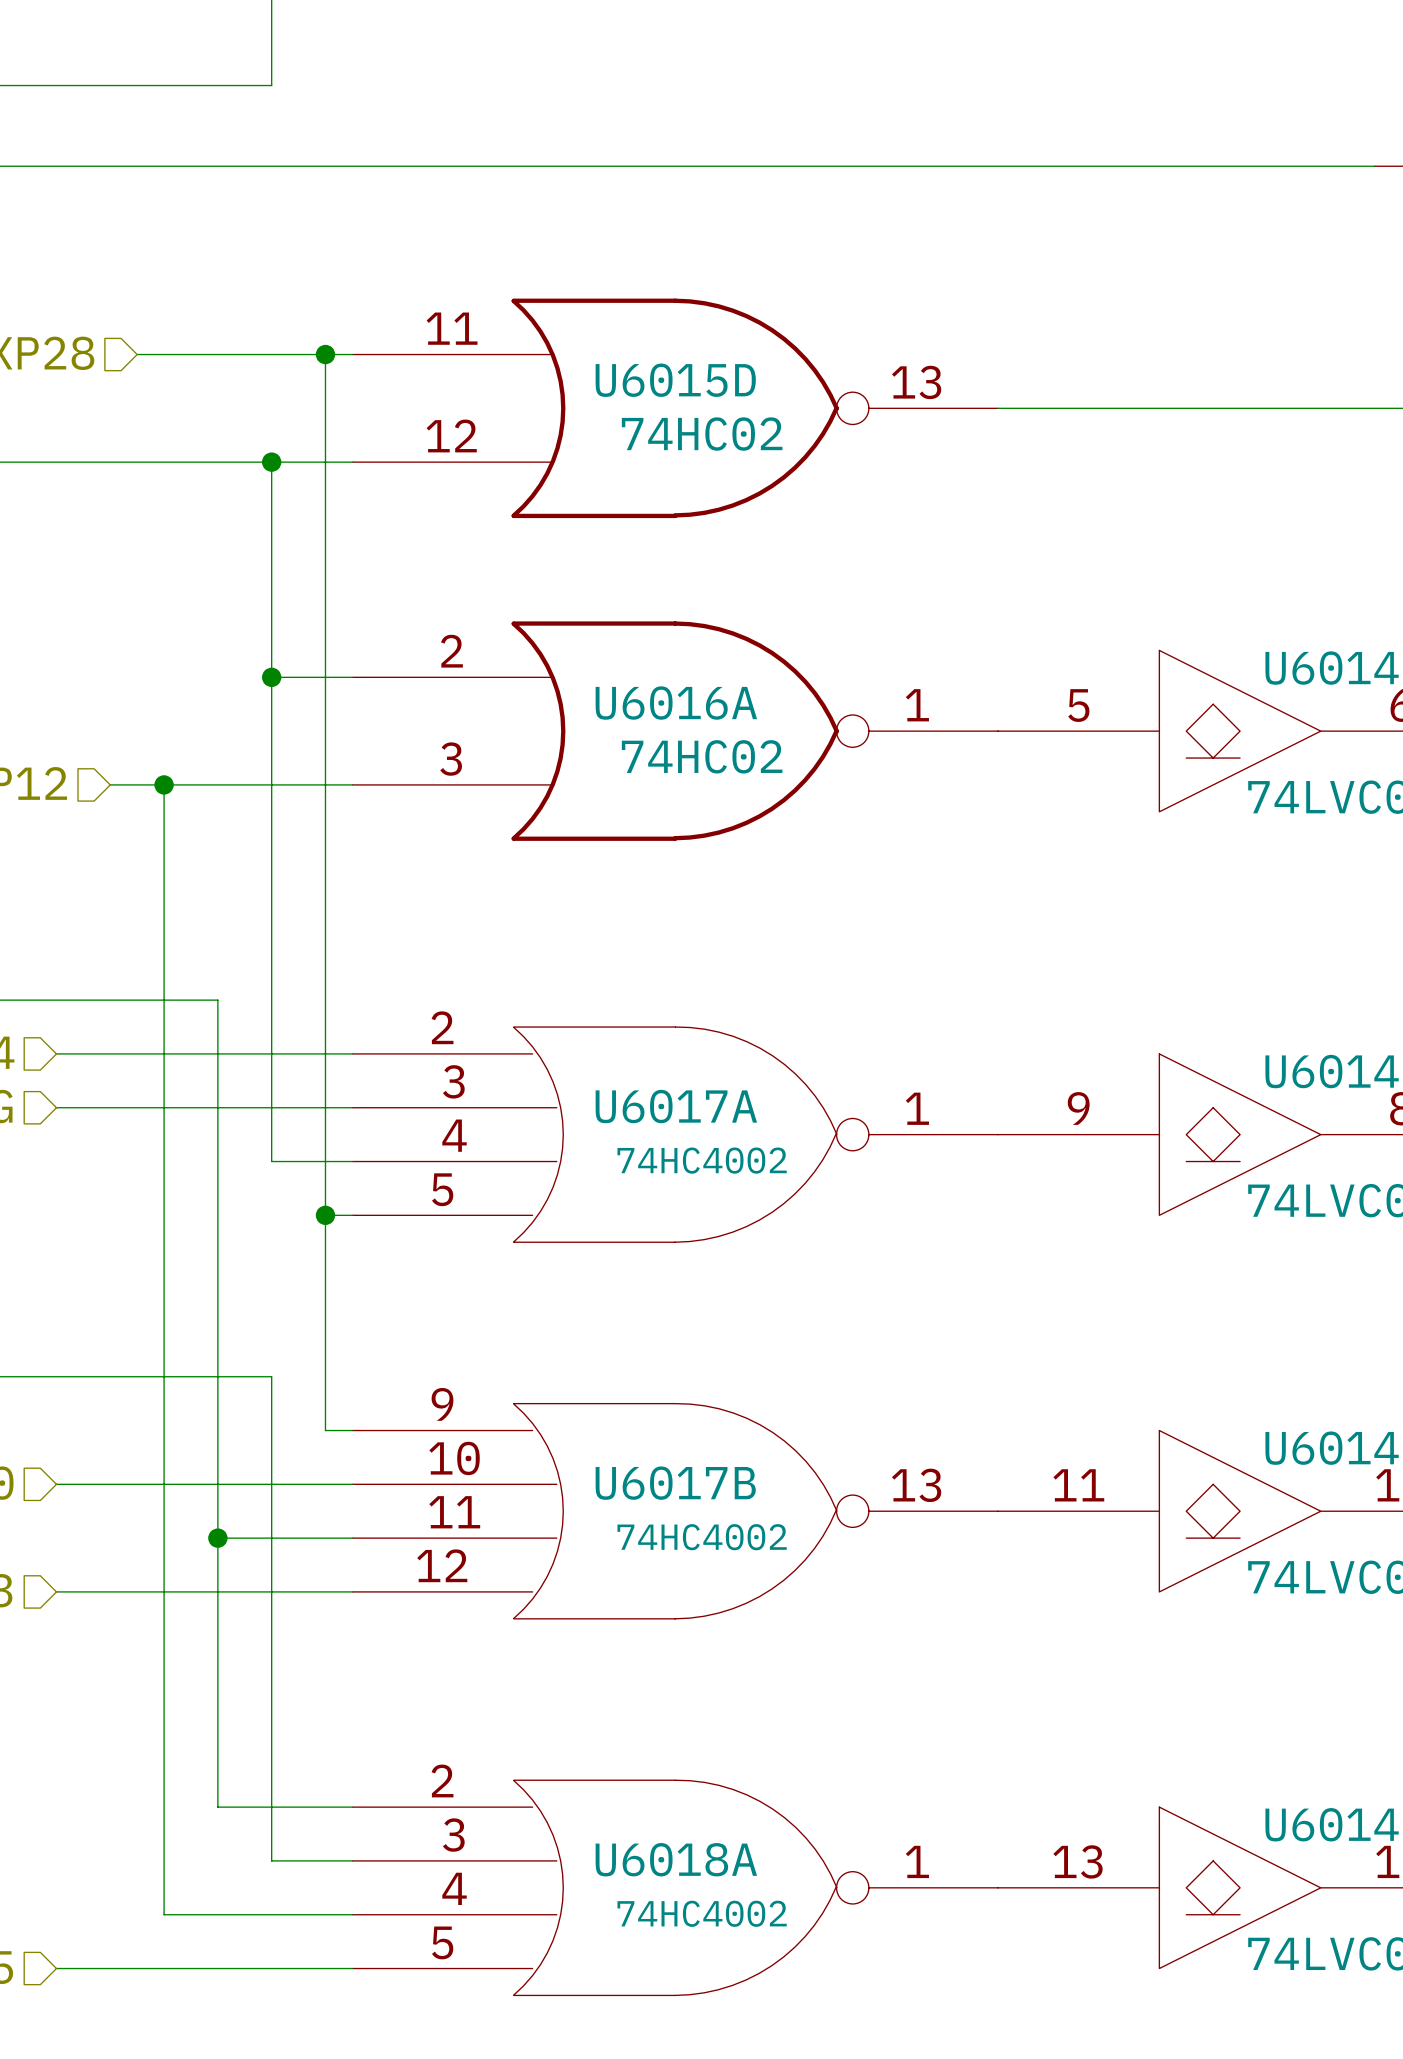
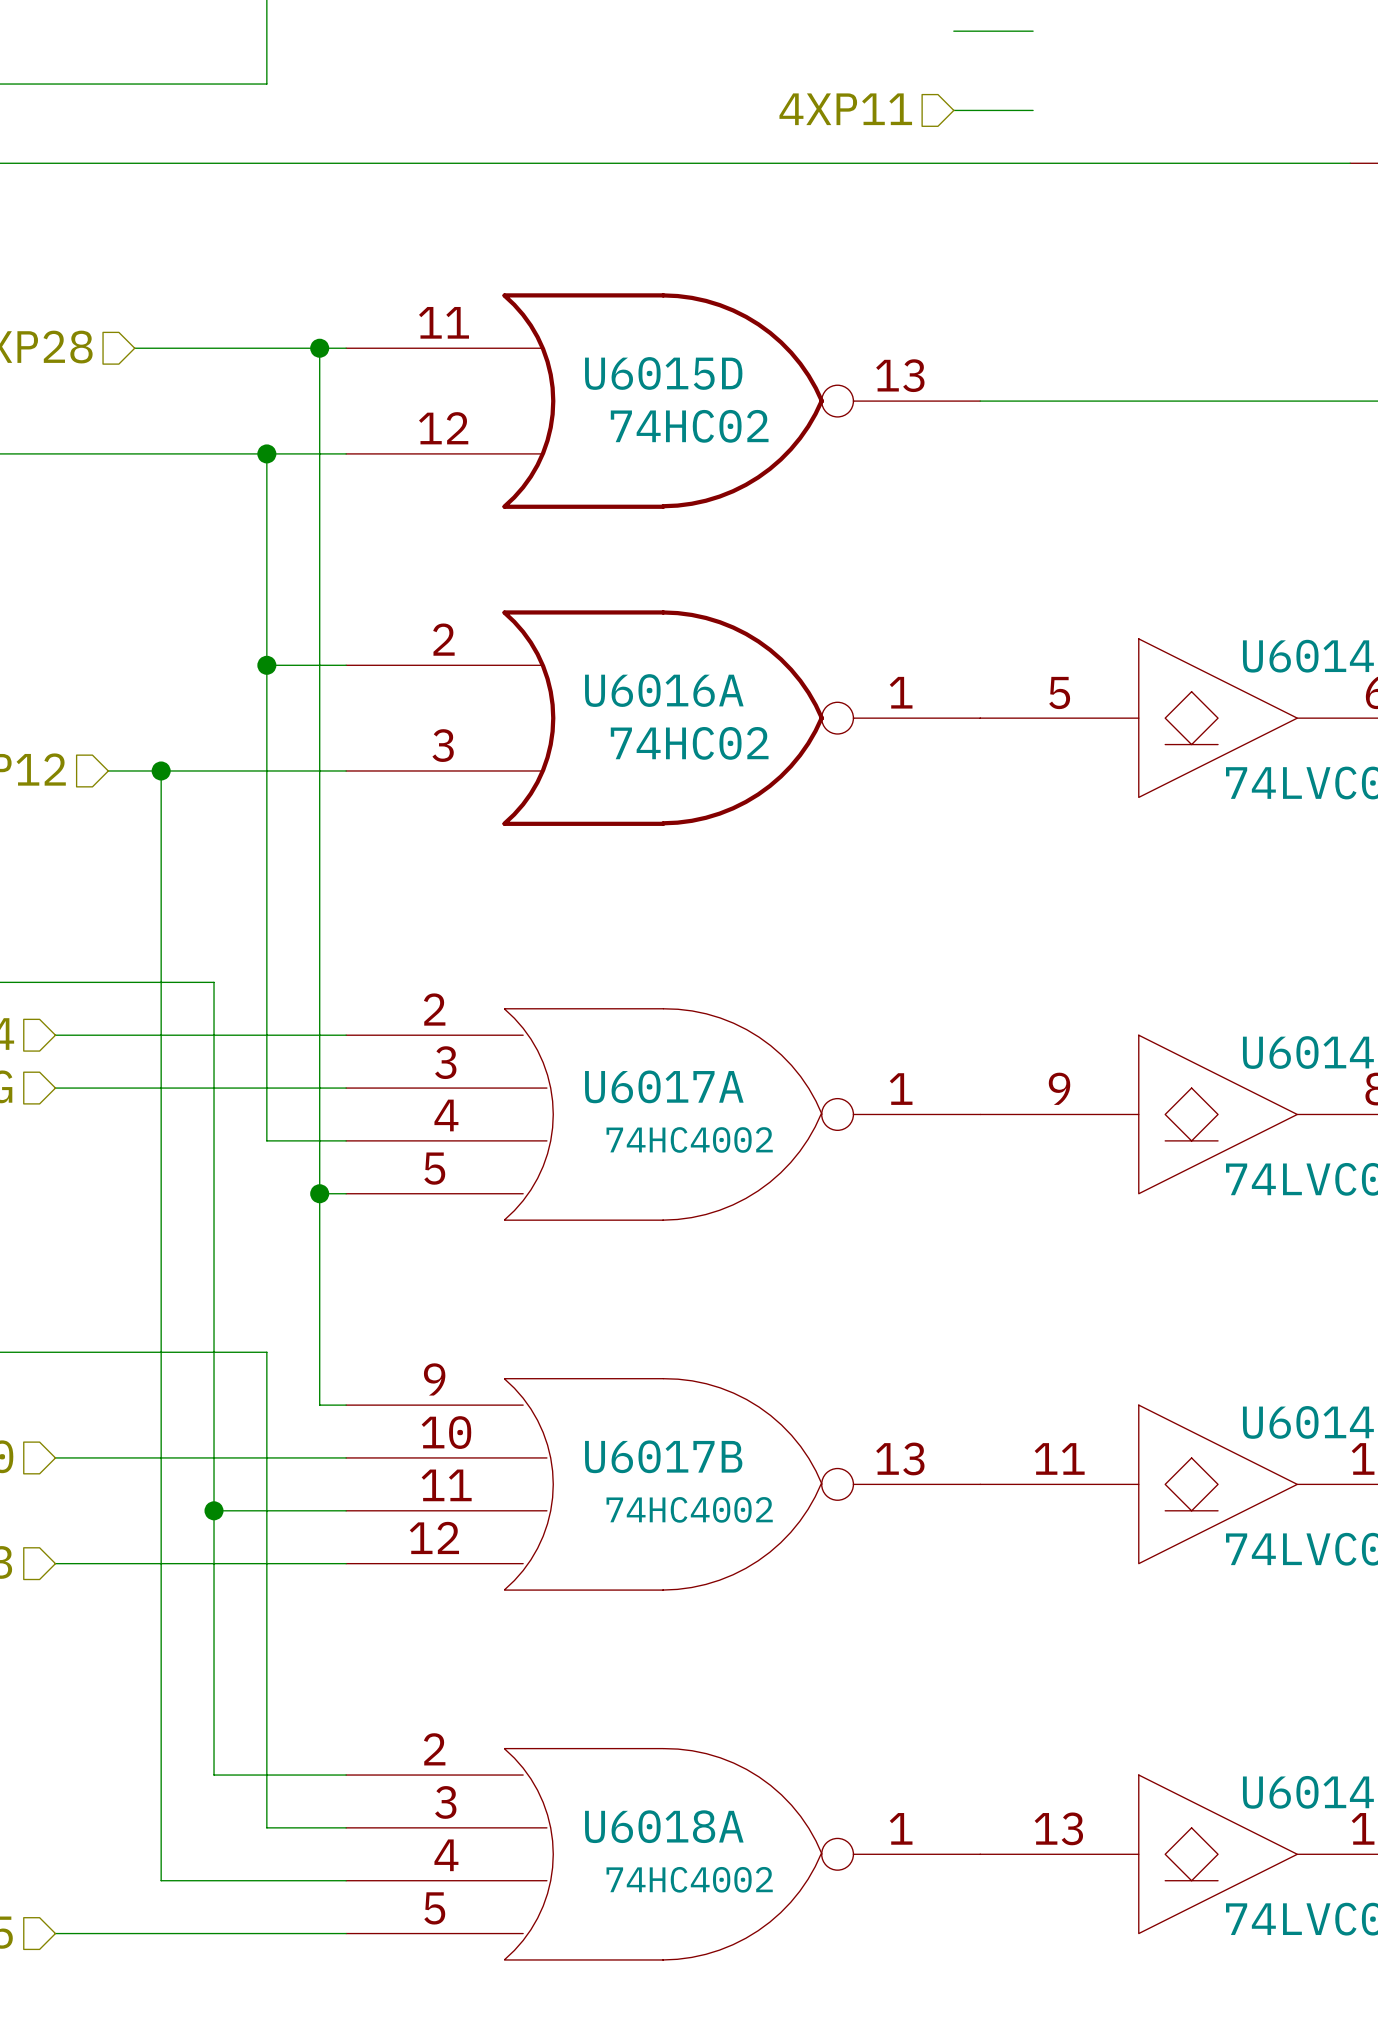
wire: none -> (953, 31) (1033, 31)
hierarchical label: none -> 4XP11 (845, 109)
wire: none -> (953, 110) (1033, 110)

